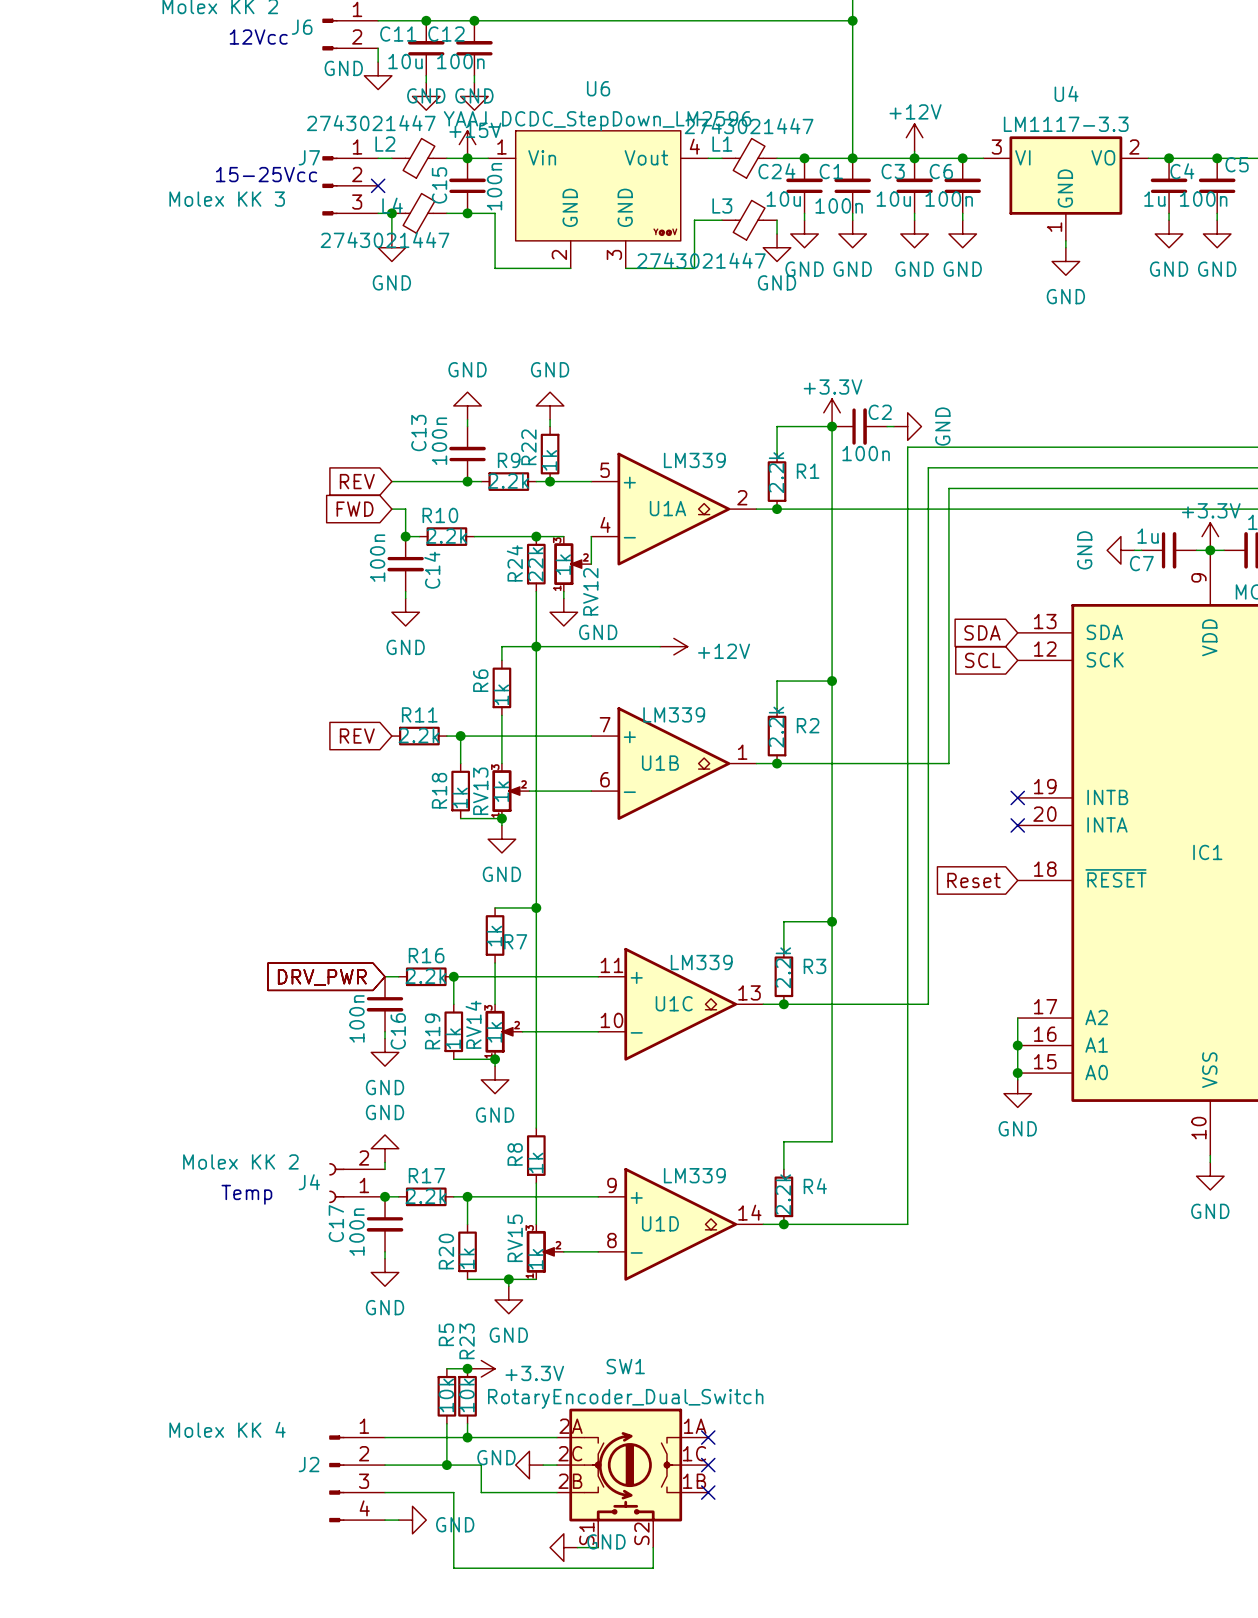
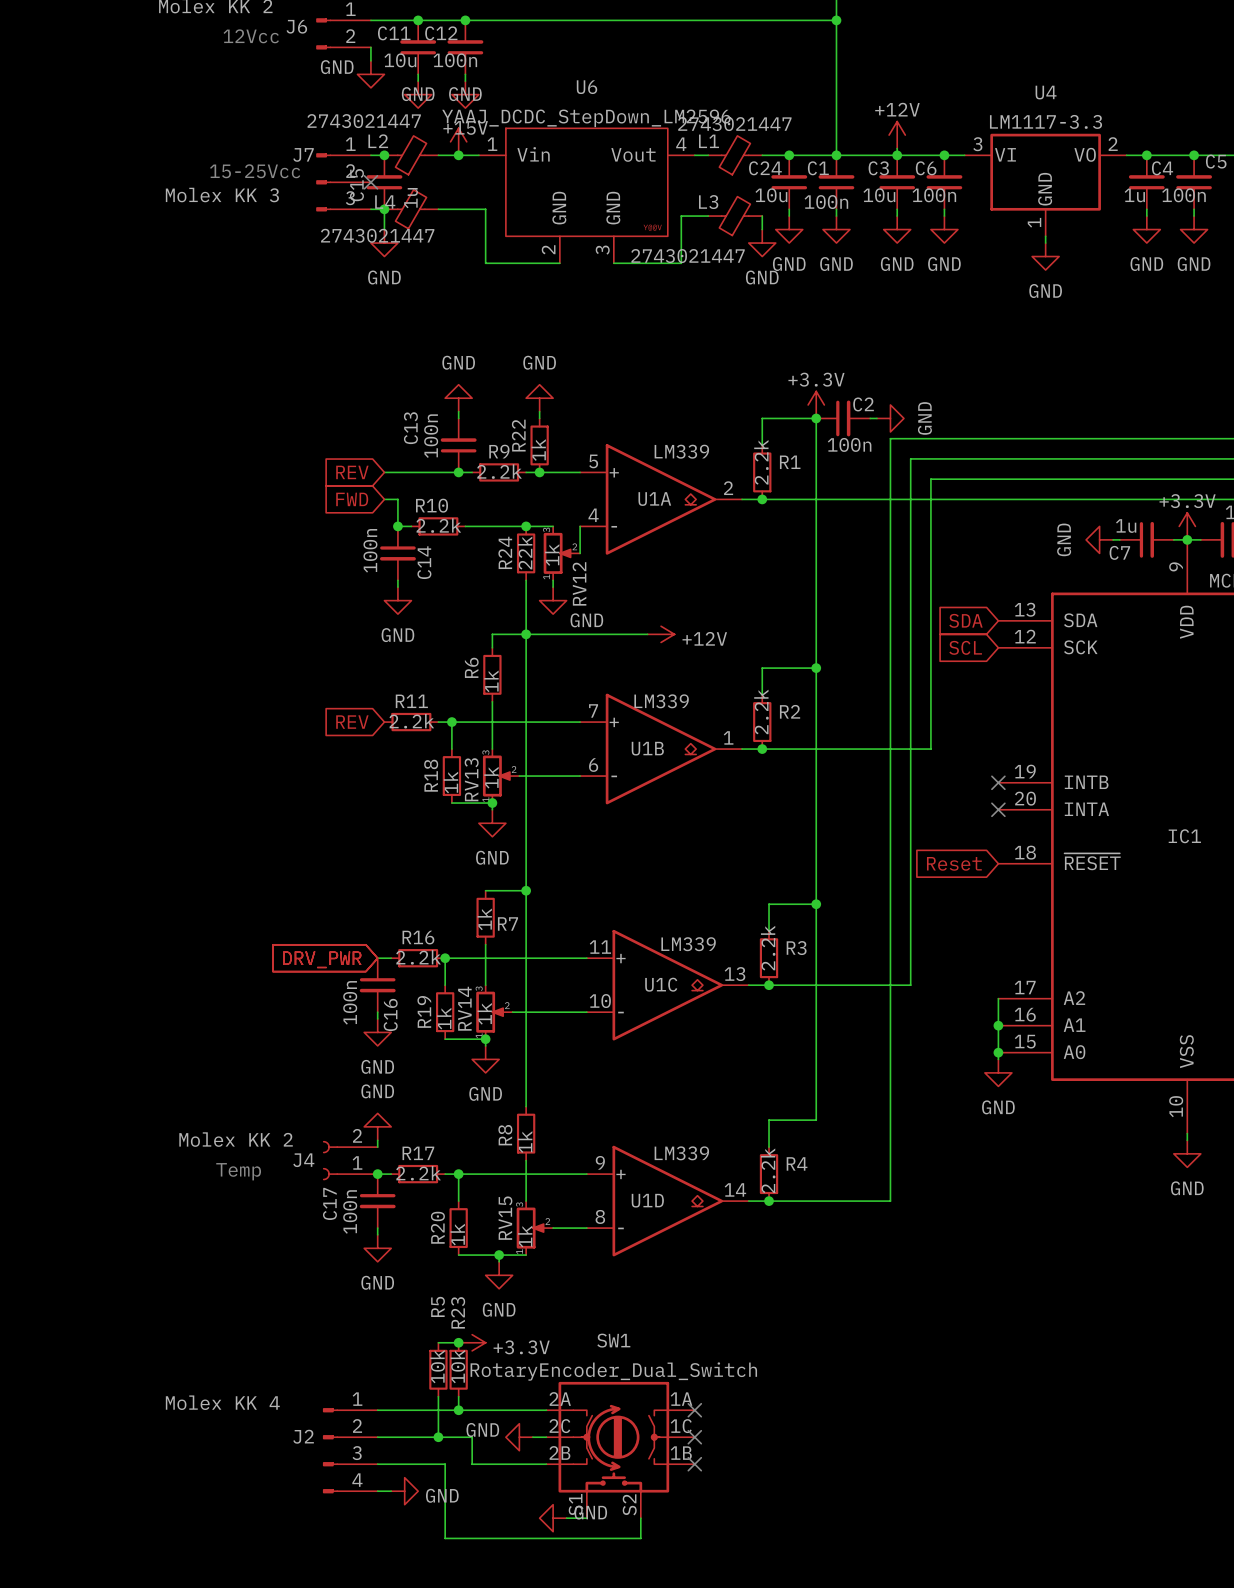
junction: none -> (384, 155)
C15 position: (467, 185) -> (384, 182)
C15 value: 100n (494, 186) -> 1u (411, 198)
junction: (467, 213) -> none

